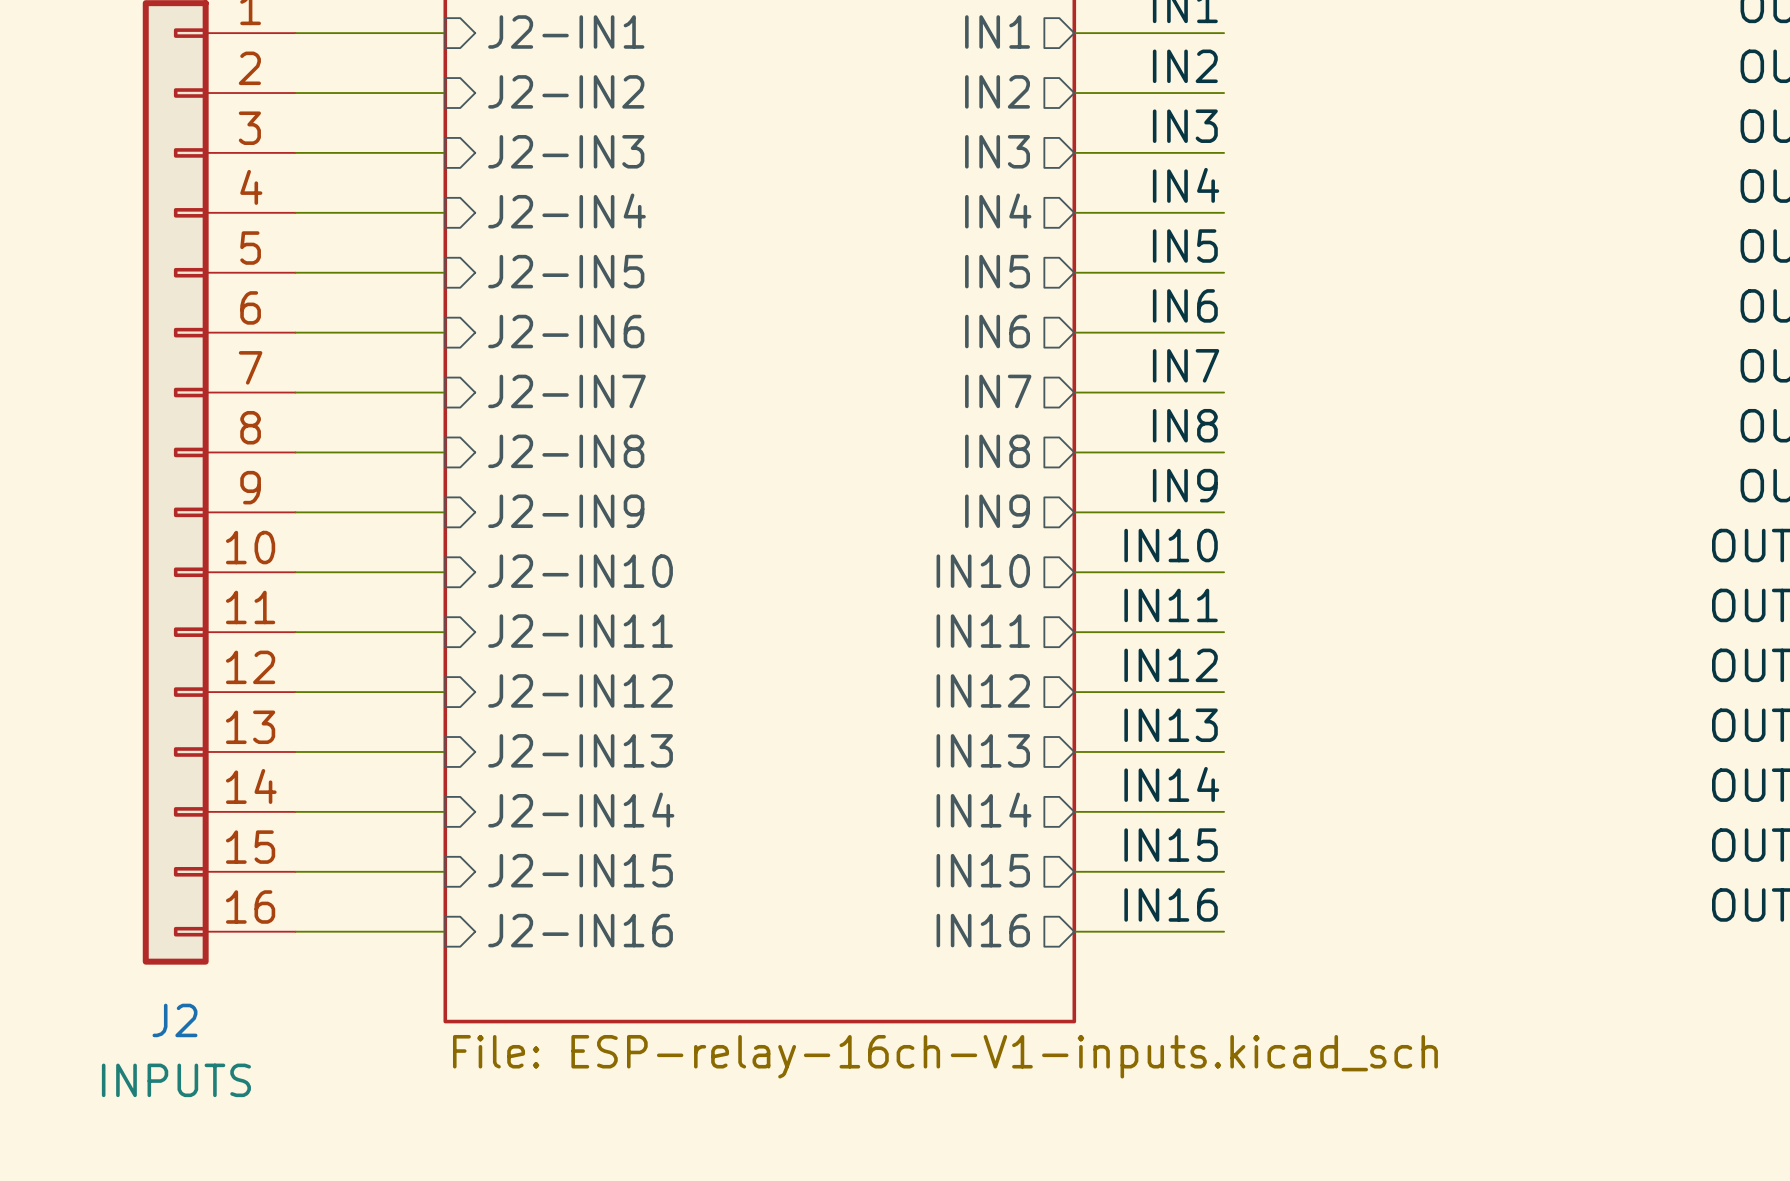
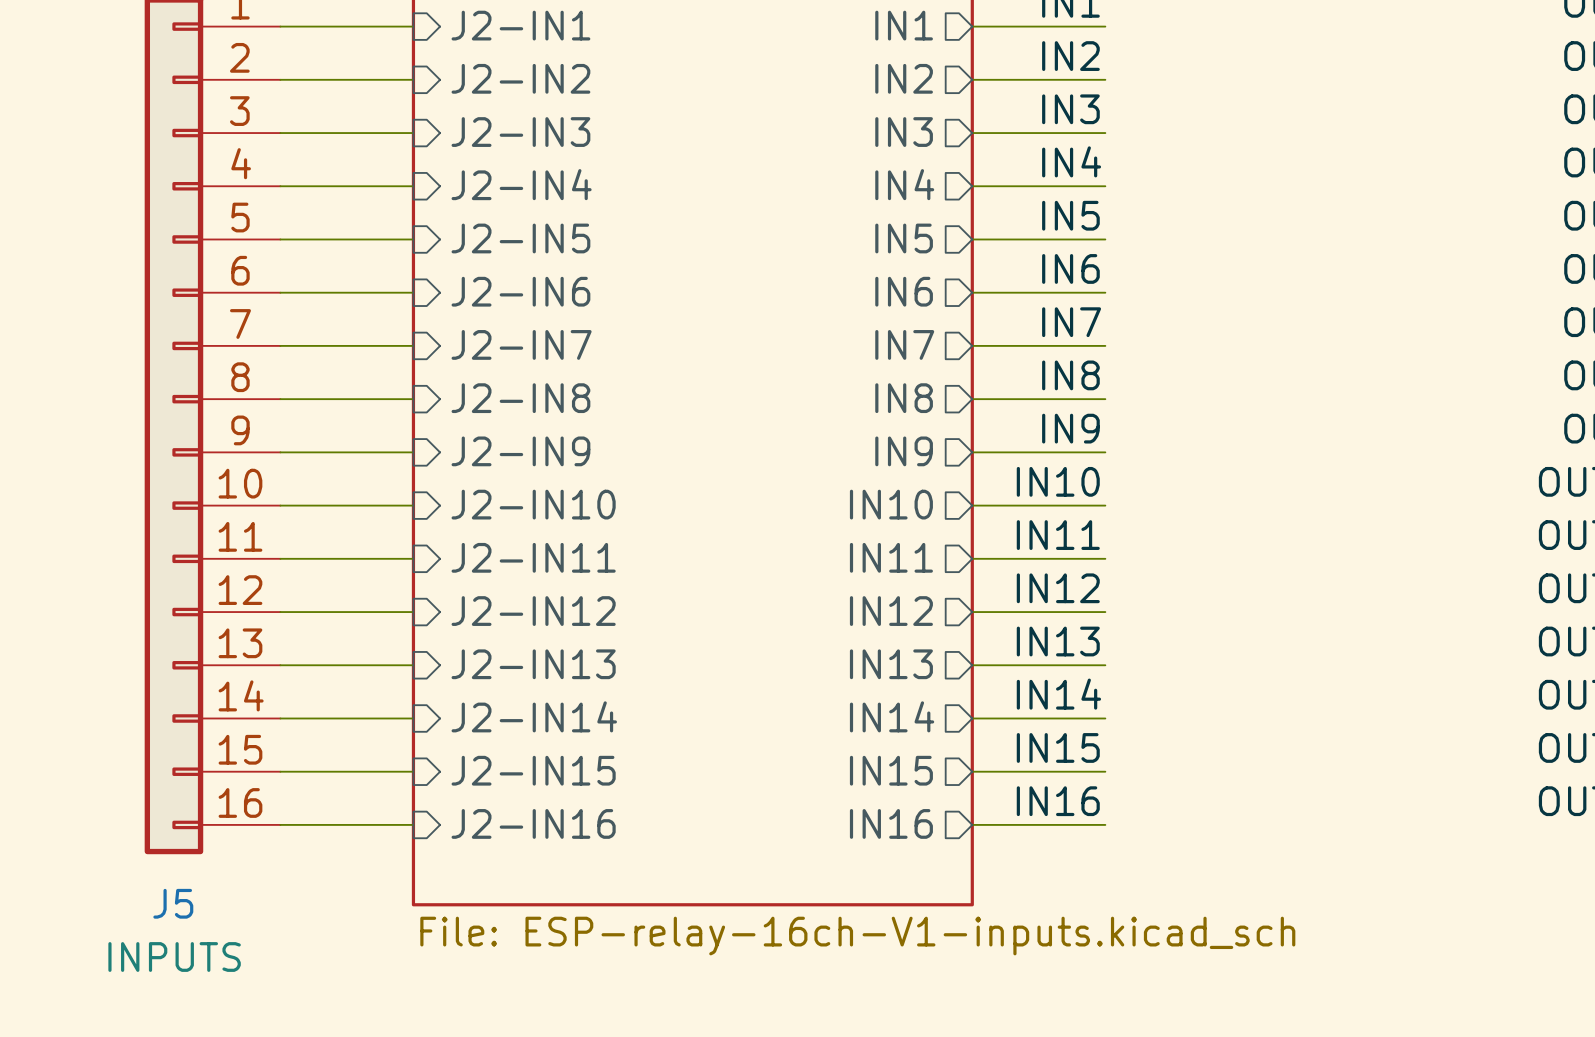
J2 name: J2 (174, 1020) -> J5 (173, 903)

